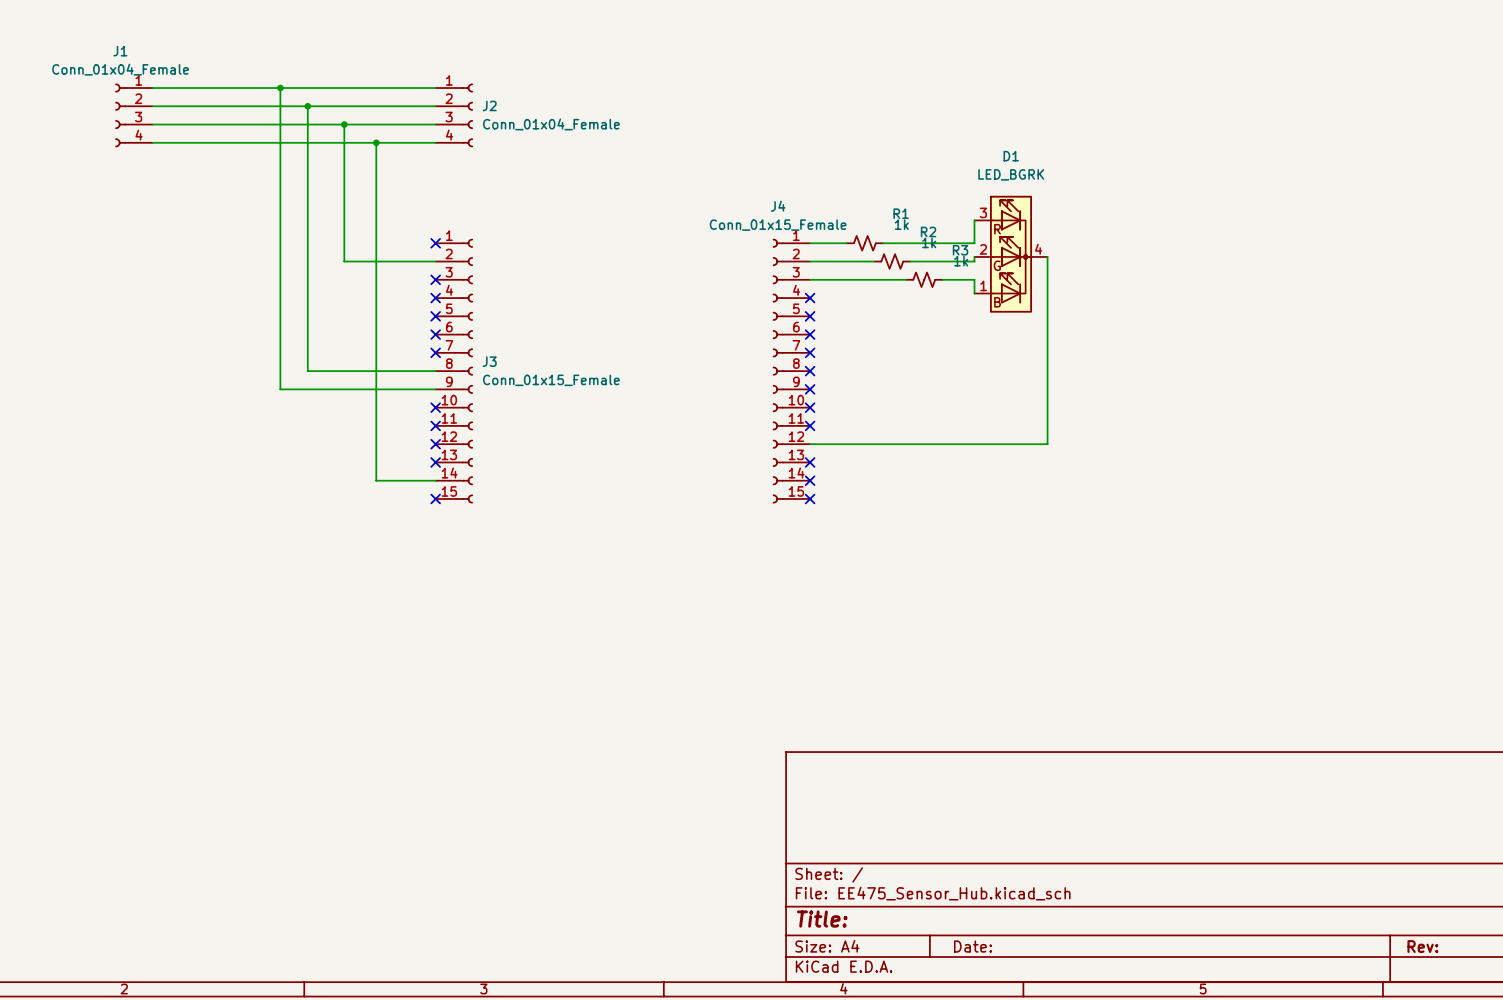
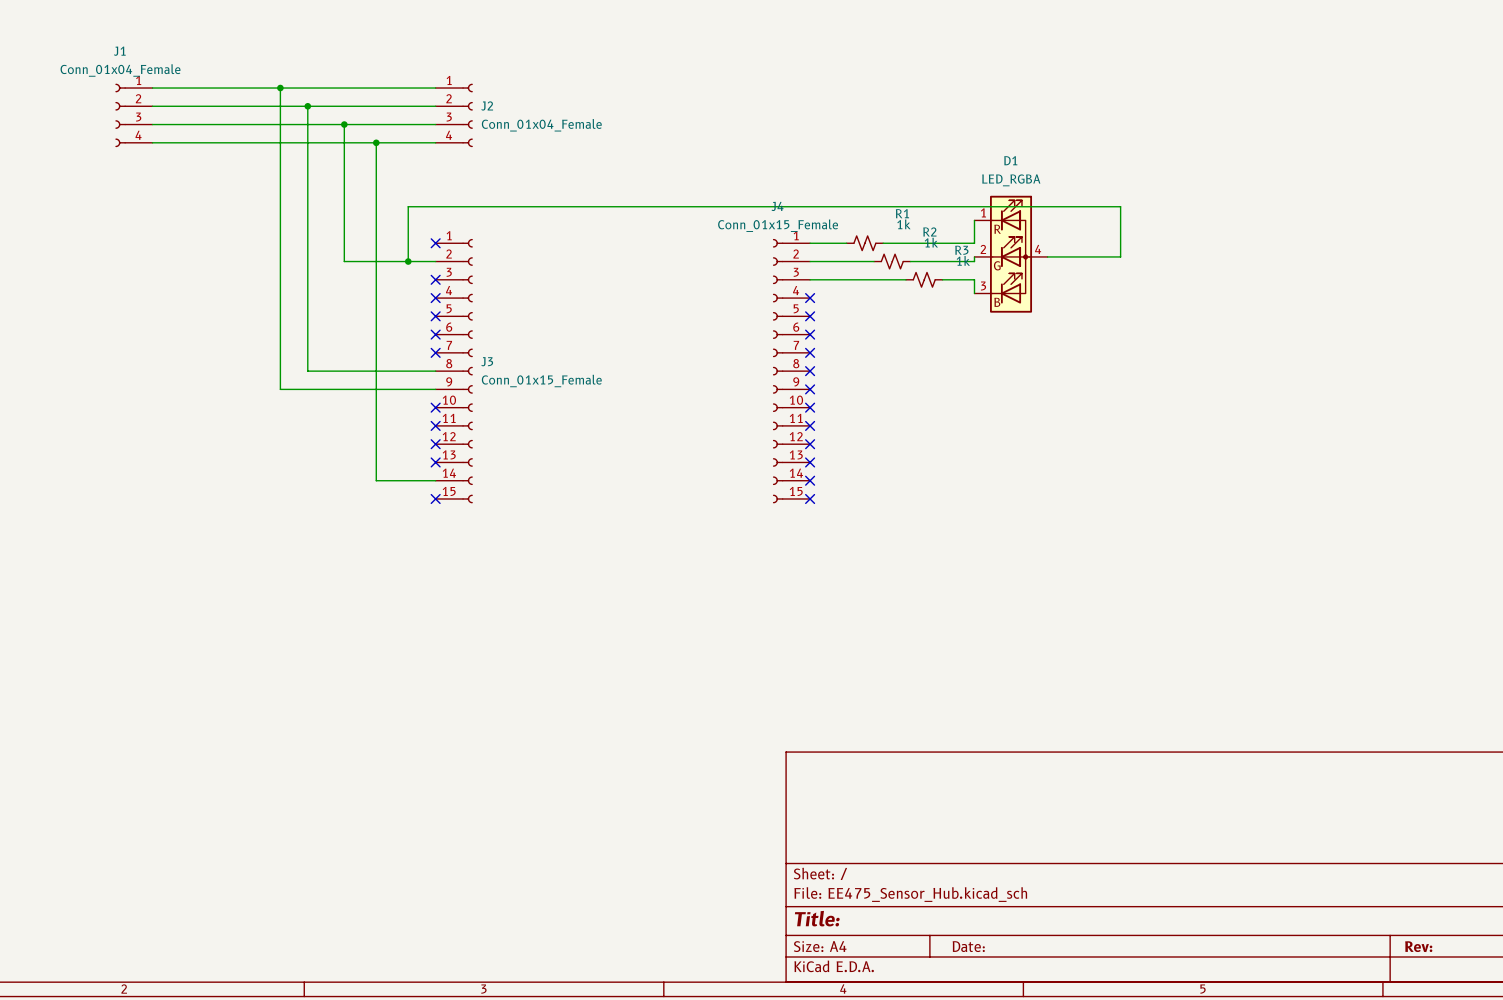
D1 value: LED_BGRK (1011, 174) -> LED_RGBA (1011, 180)
D1 symbol: [974, 195, 1048, 313] -> [974, 195, 1048, 313]
wire: (1047, 256) (1047, 444) (810, 444) -> (1047, 256) (1120, 256) (1120, 206) (408, 206) (408, 261)
junction: none -> (408, 261)
no-connect mark: none -> (810, 444)

